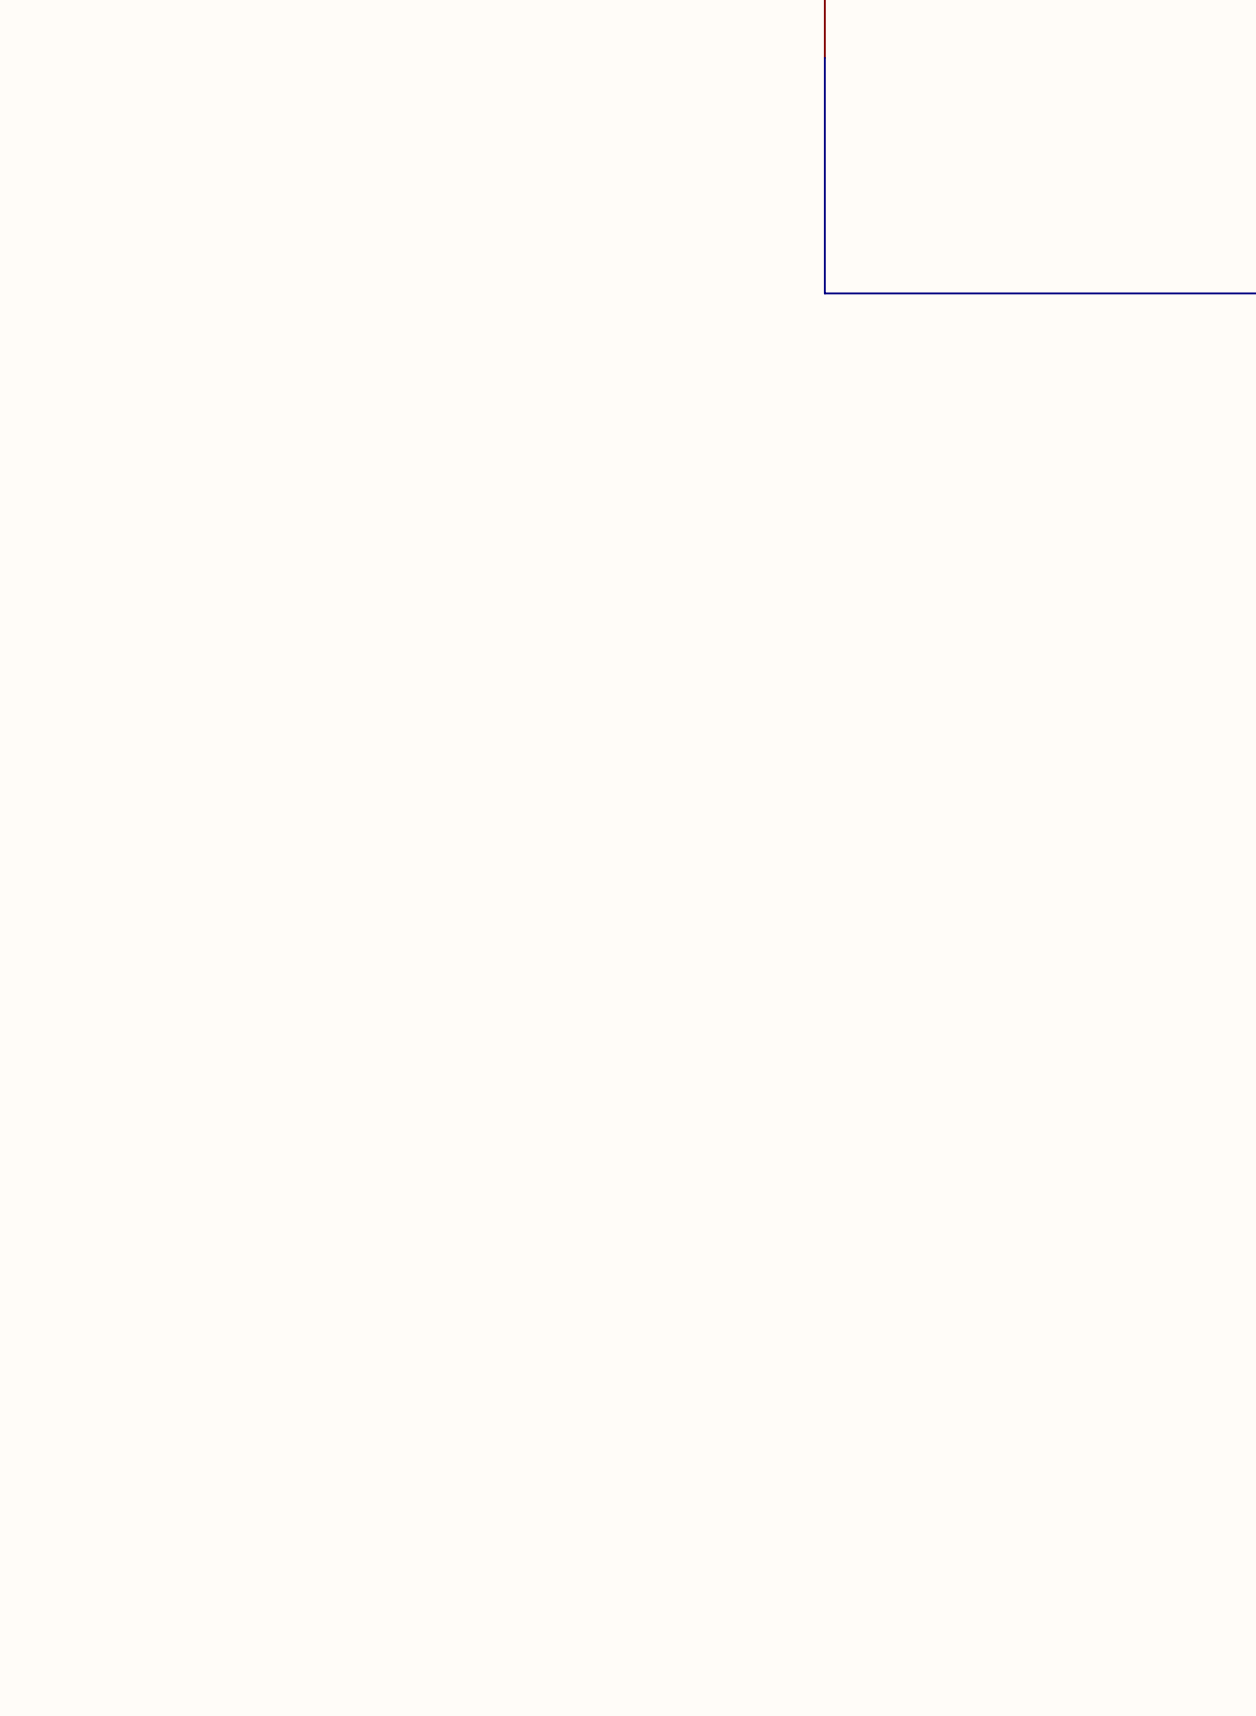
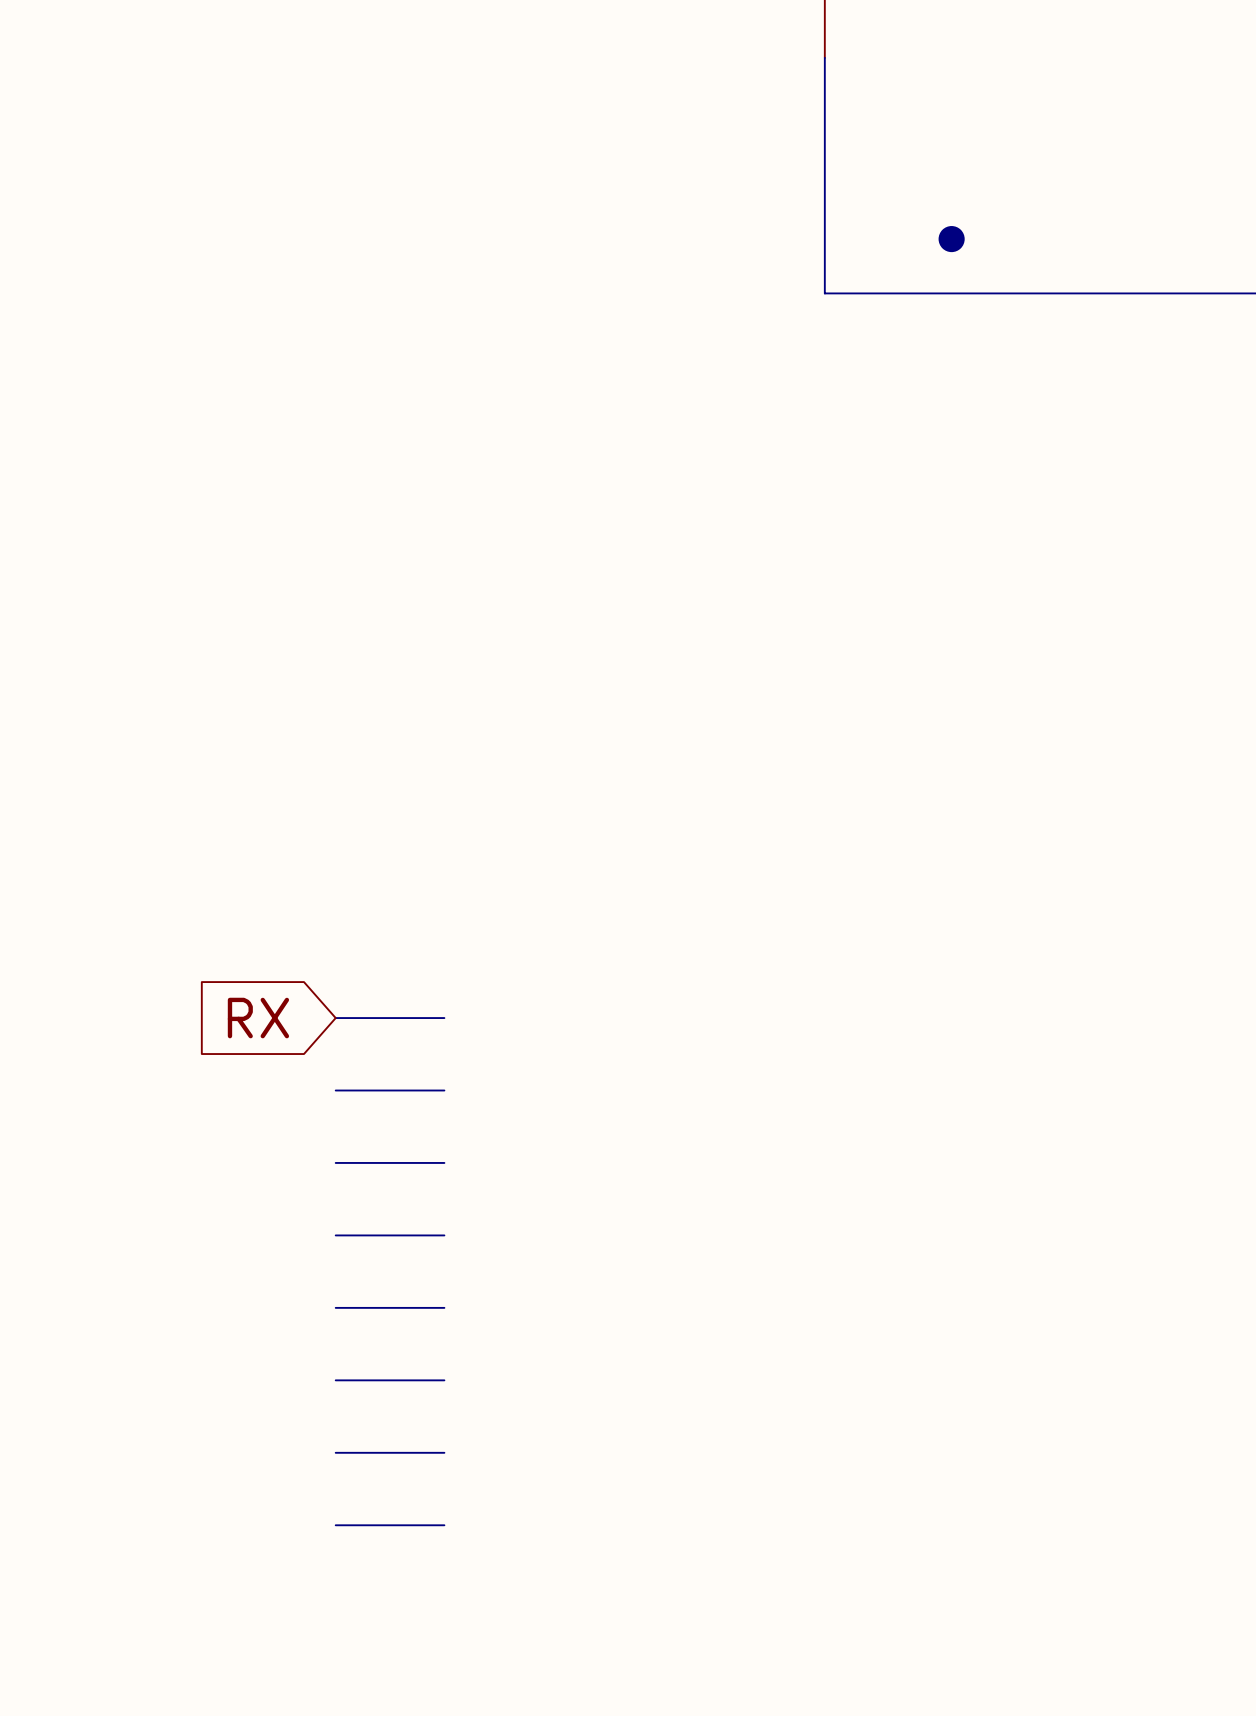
junction: none -> (951, 239)
global label: none -> RX (258, 1018)
wire: none -> (335, 1018) (444, 1018)
wire: none -> (335, 1090) (444, 1090)
wire: none -> (335, 1162) (444, 1162)
wire: none -> (335, 1235) (444, 1235)
wire: none -> (335, 1307) (444, 1307)
wire: none -> (335, 1380) (444, 1380)
wire: none -> (335, 1452) (444, 1452)
wire: none -> (335, 1525) (444, 1525)

